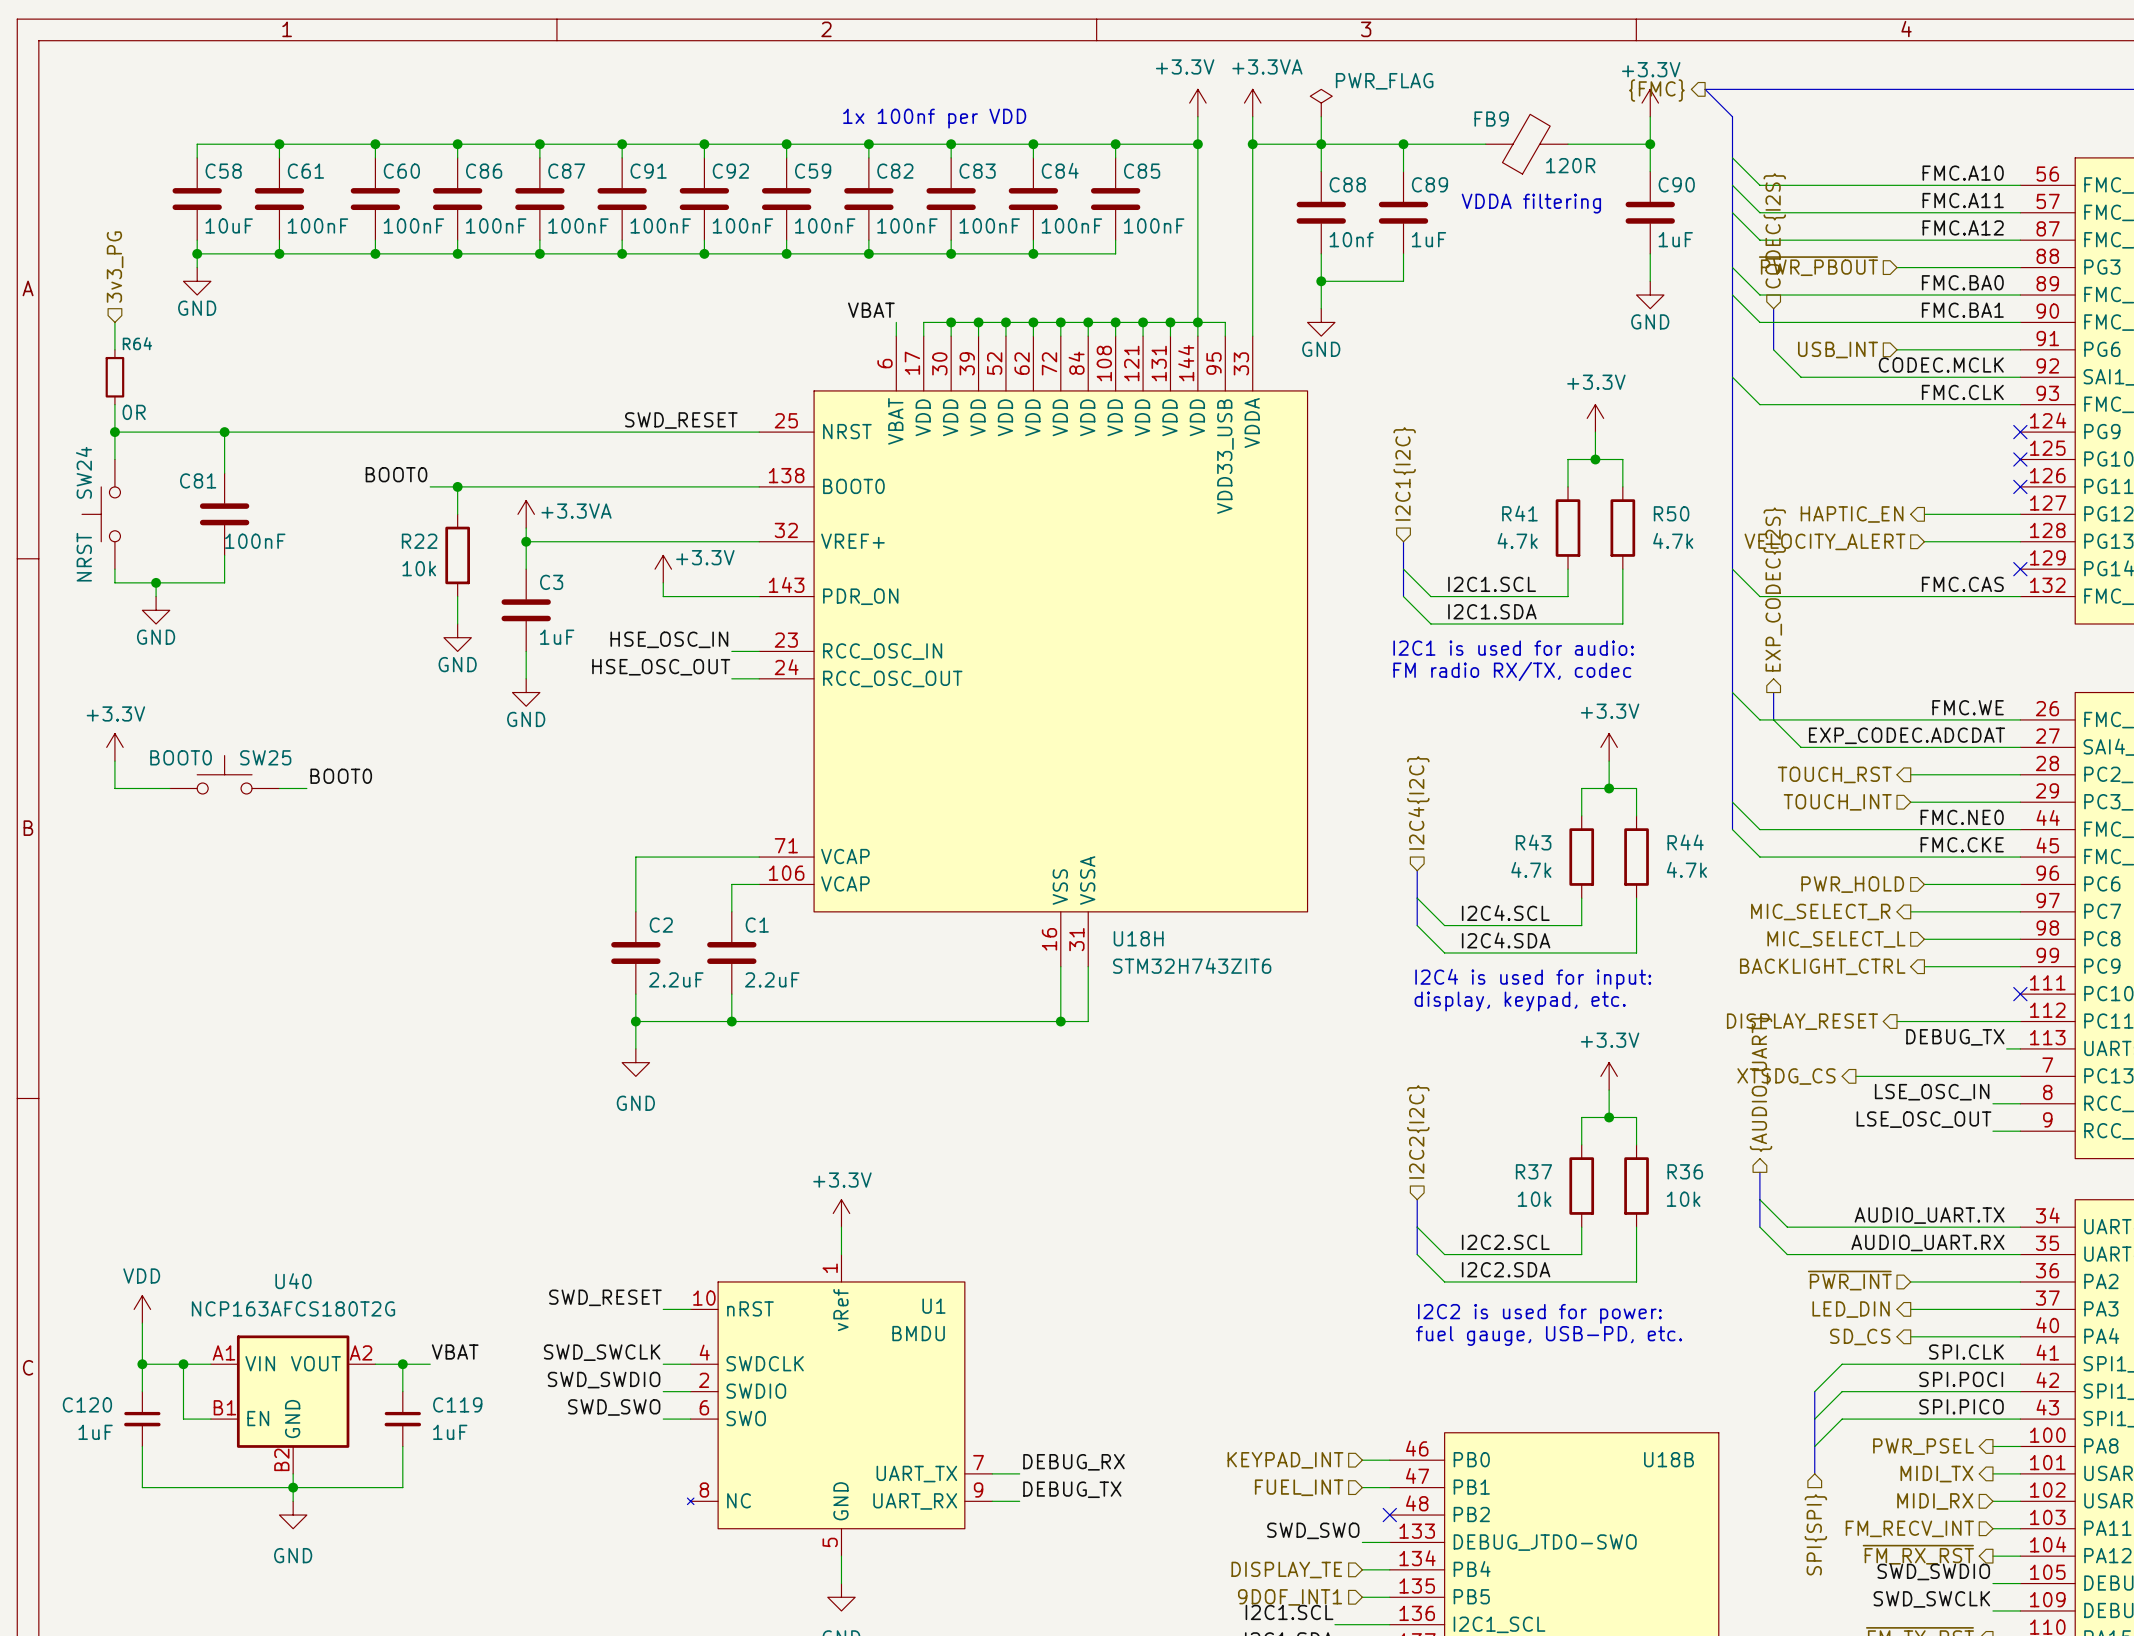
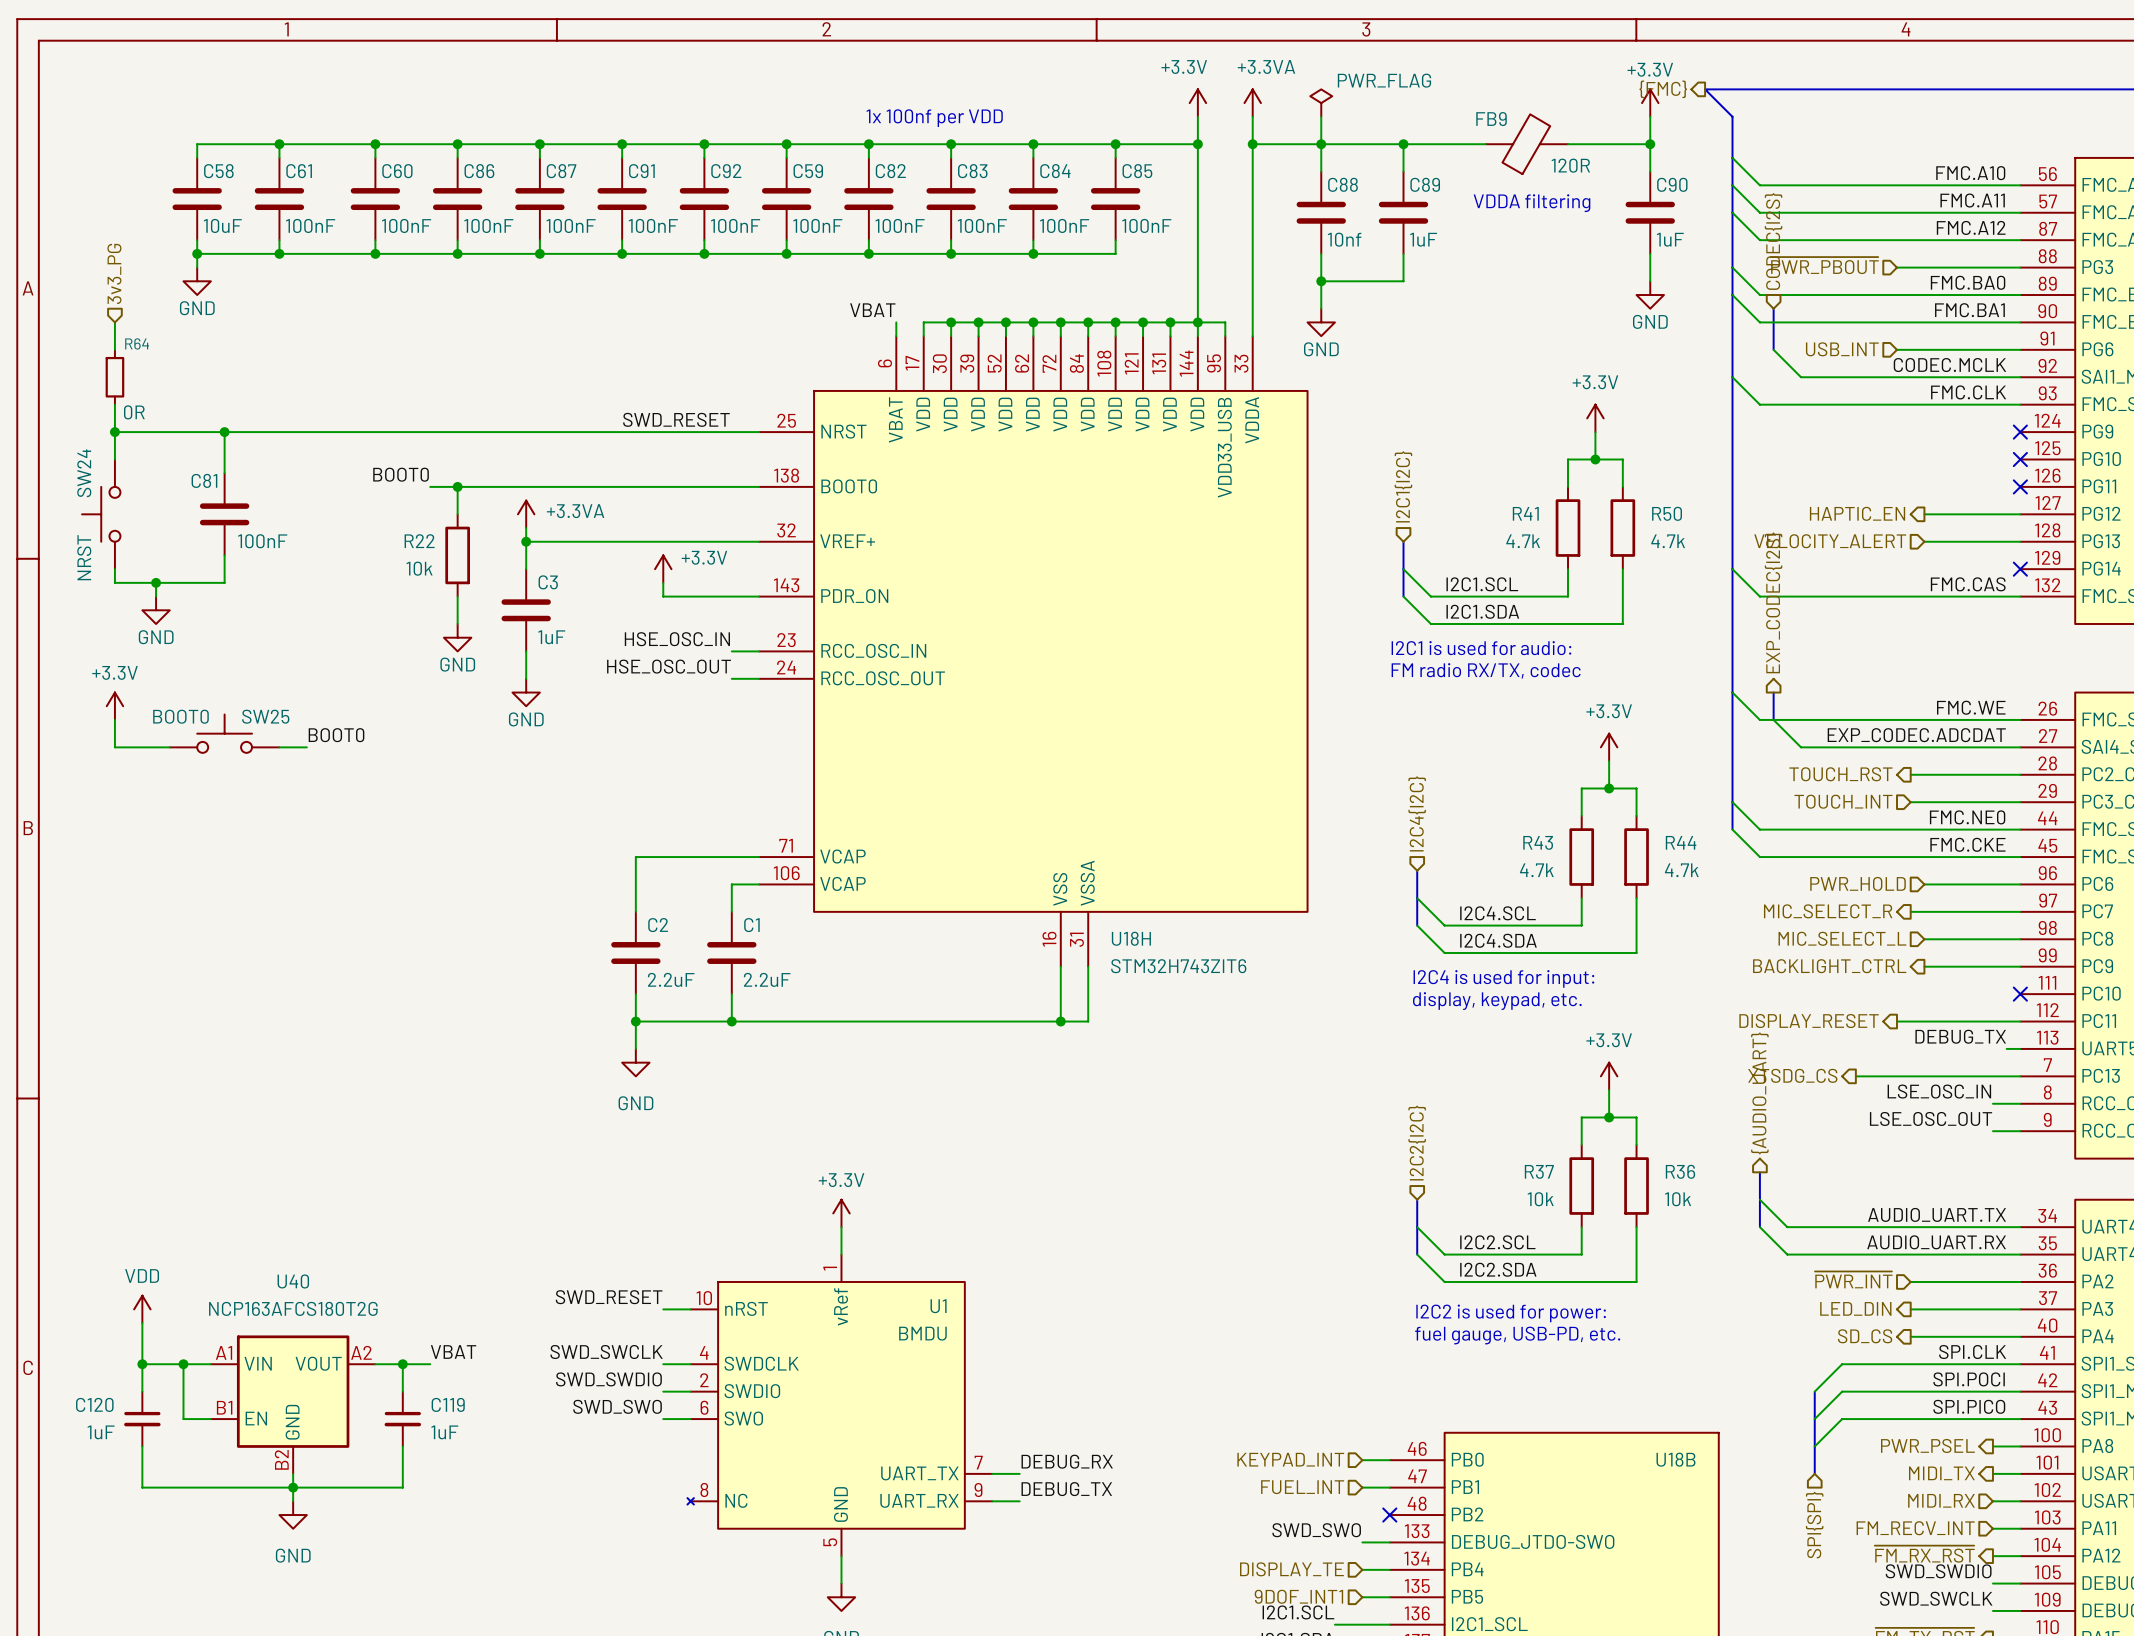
power symbol position: +3.3V (114, 747) -> +3.3V (114, 706)
wire: (114, 761) (114, 788) (169, 788) -> (114, 719) (114, 747) (169, 747)
SW25 position: (224, 774) -> (224, 733)
label position: BOOT0 (341, 776) -> BOOT0 (336, 735)
wire: (279, 788) (306, 788) -> (279, 747) (306, 747)

